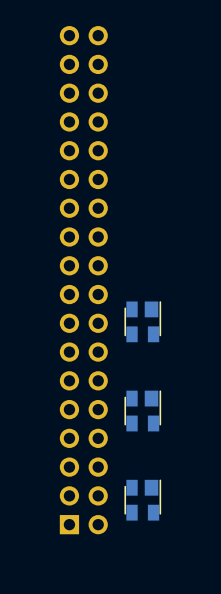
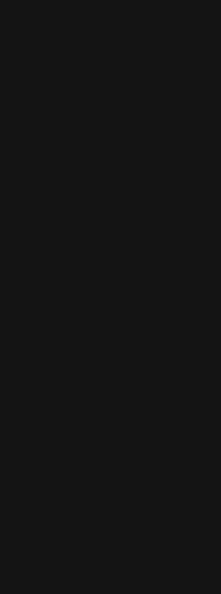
part: (83, 280) -> none
part: (142, 321) -> none
part: (142, 410) -> none
part: (142, 500) -> none

